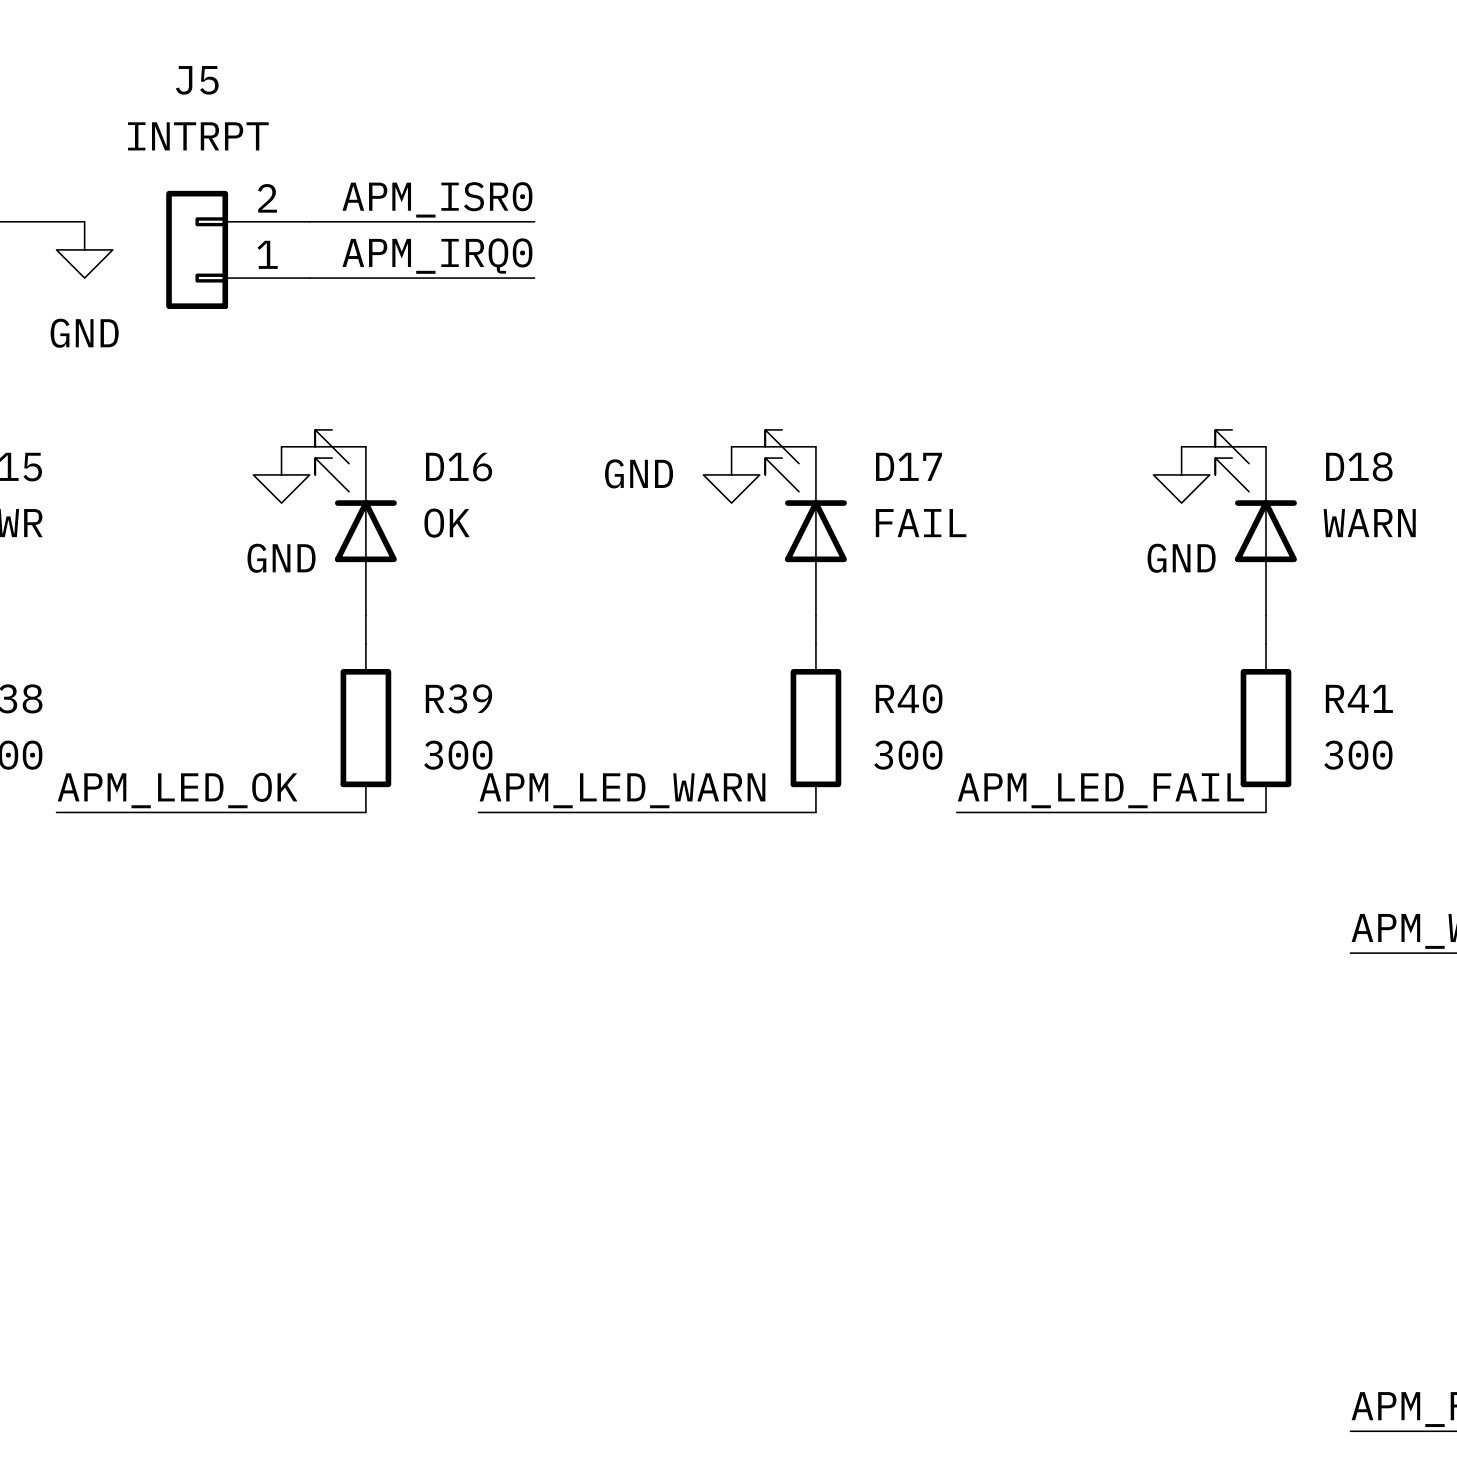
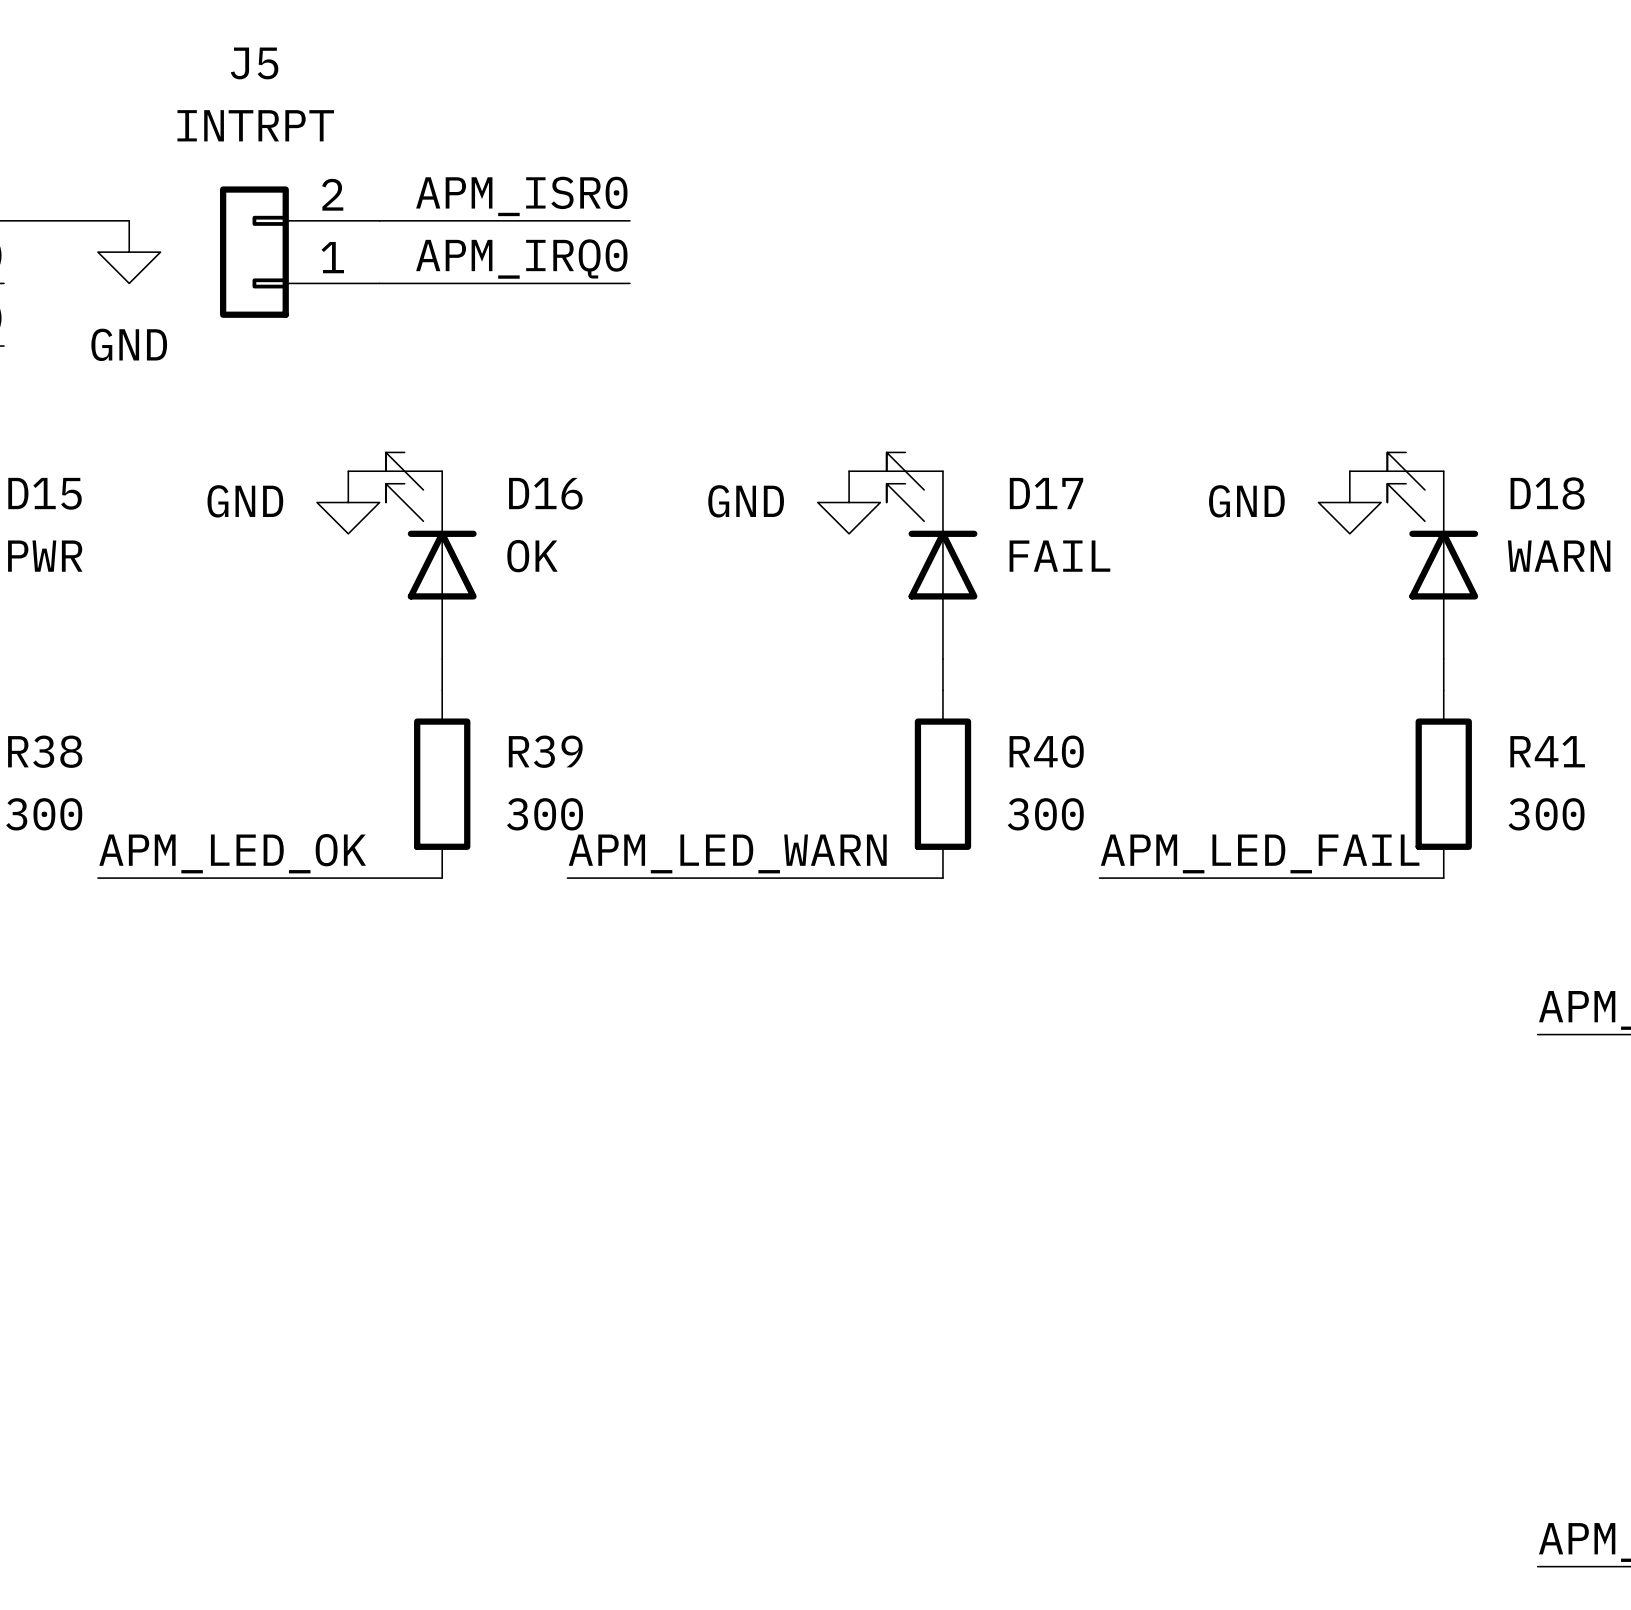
power symbol text position: GND (281, 558) -> GND (245, 501)
power symbol text position: GND (1181, 558) -> GND (1246, 501)

